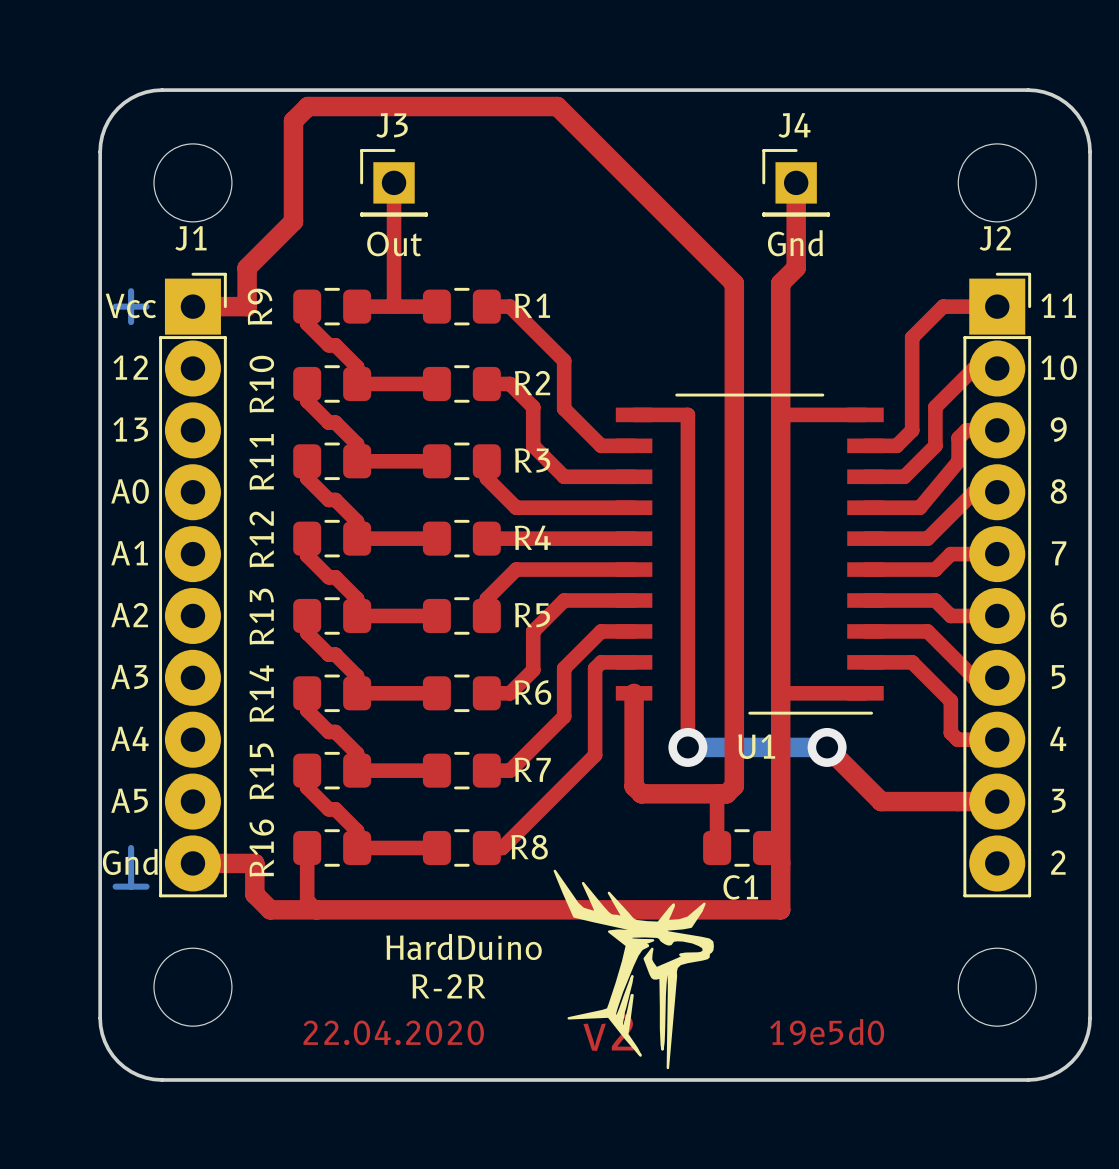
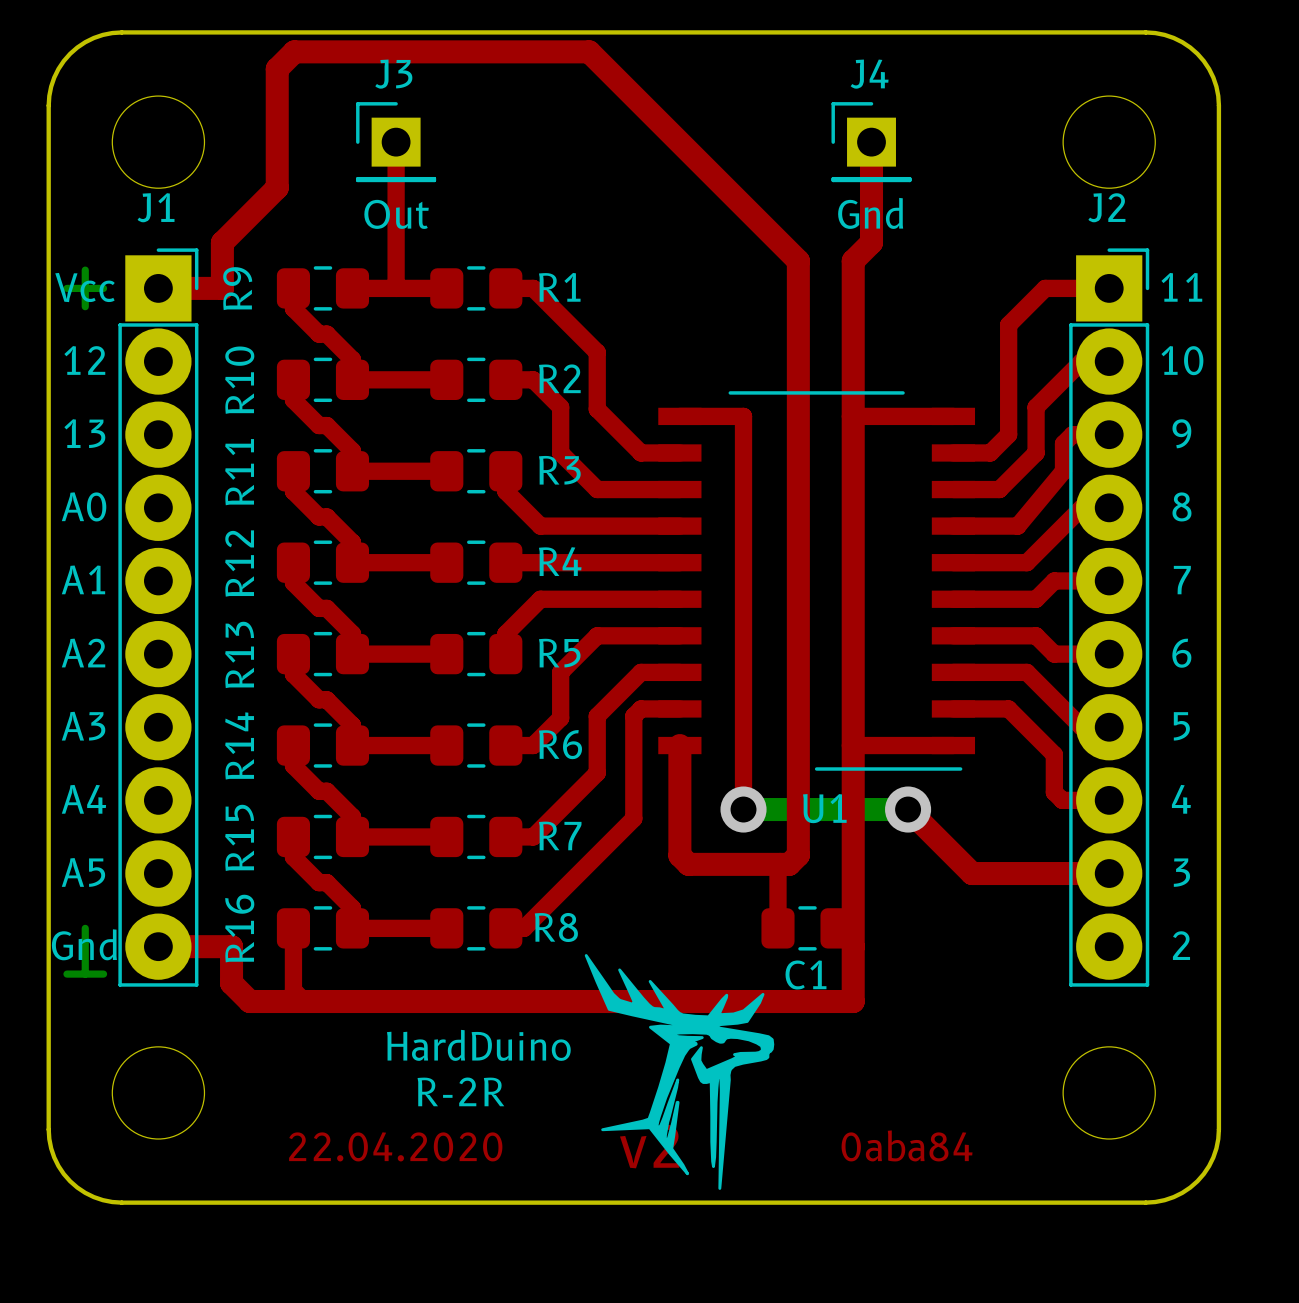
text: 19e5d0 (827, 1032) -> 0aba84 (907, 1145)

